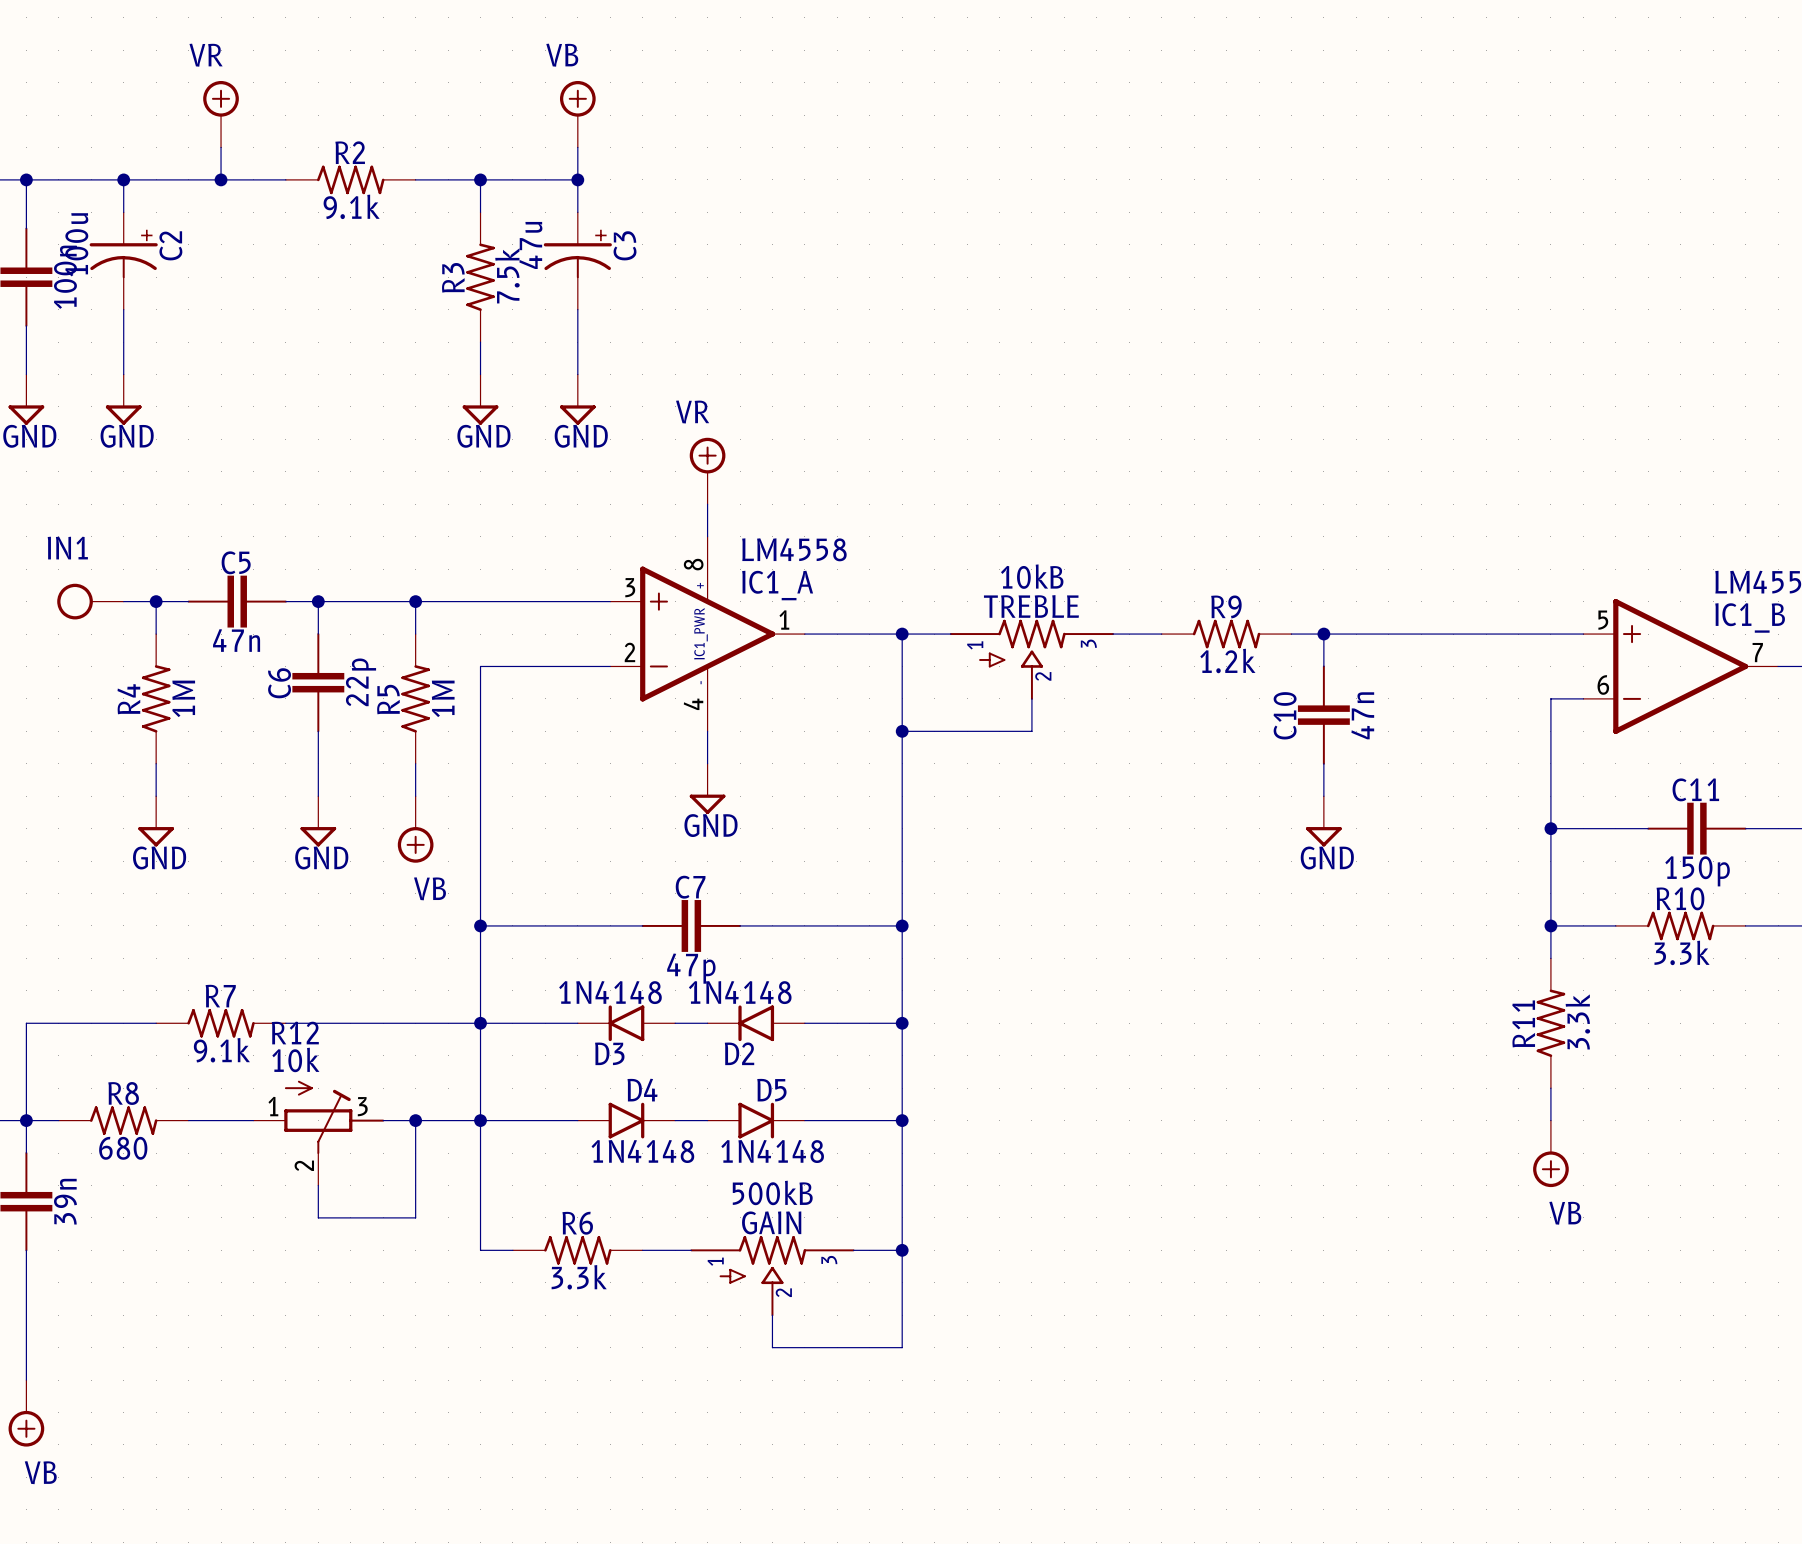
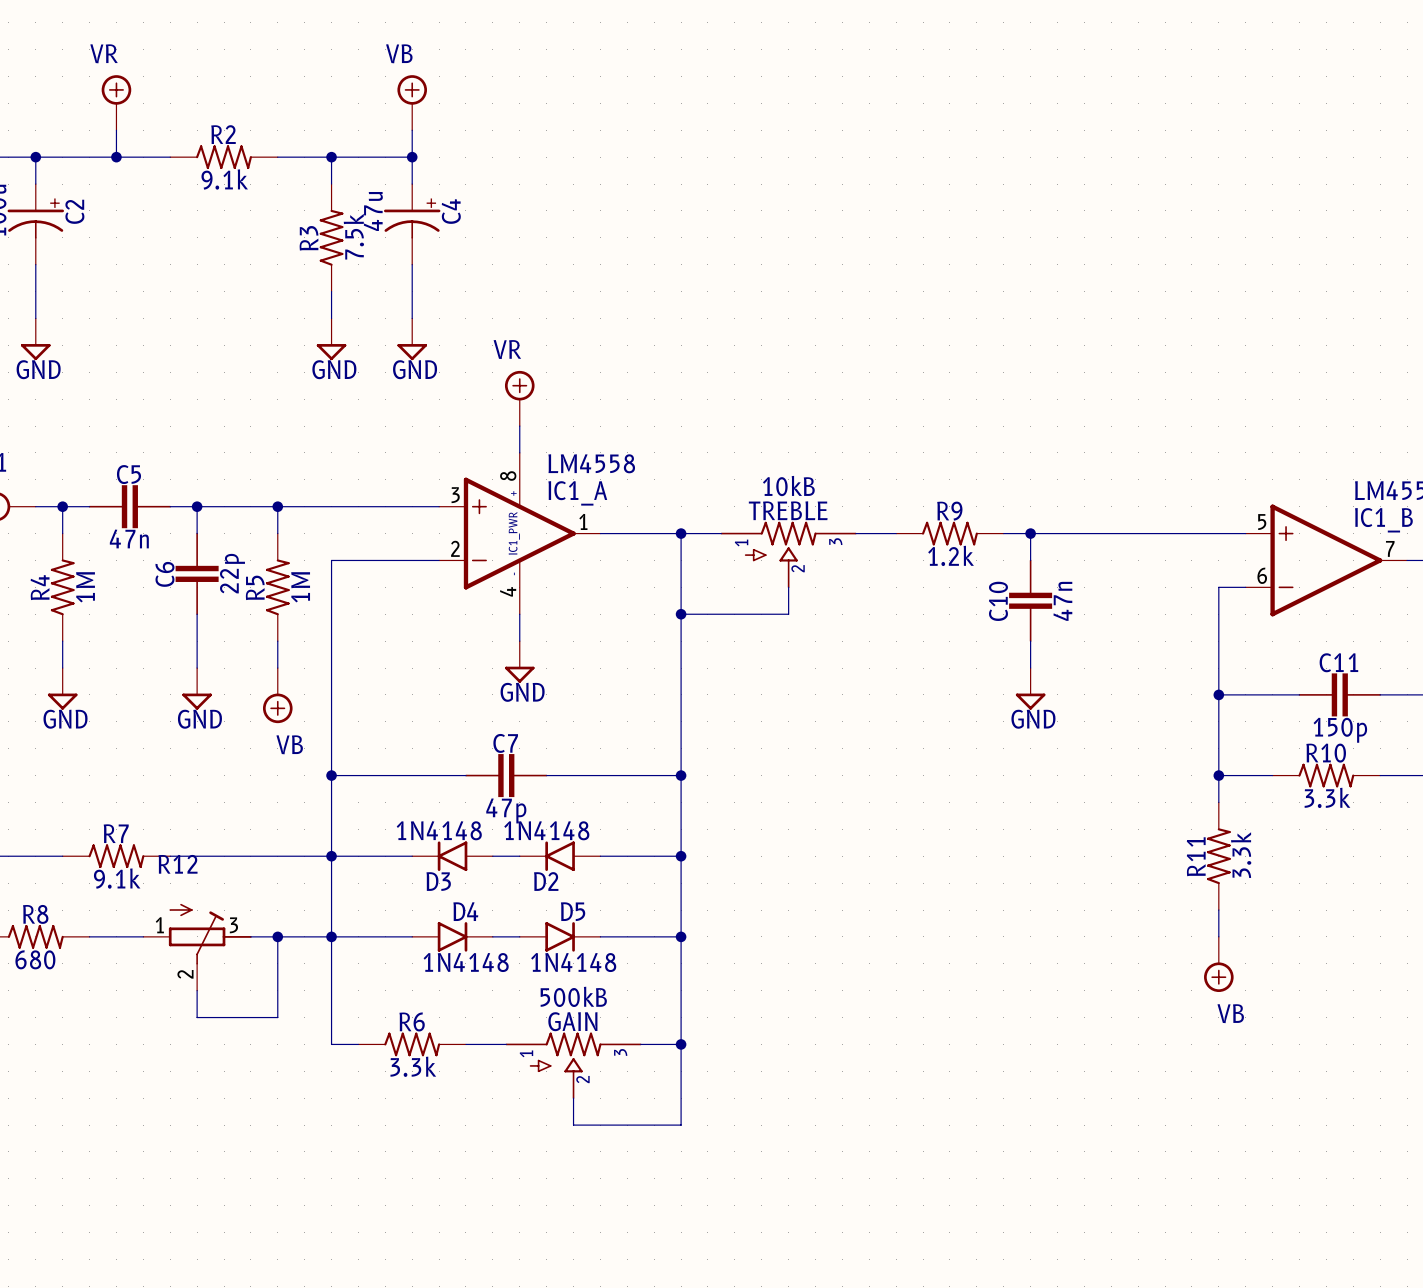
C3 name: C3 (625, 245) -> C4 (451, 211)
R12 value: 10k (295, 1059) -> none

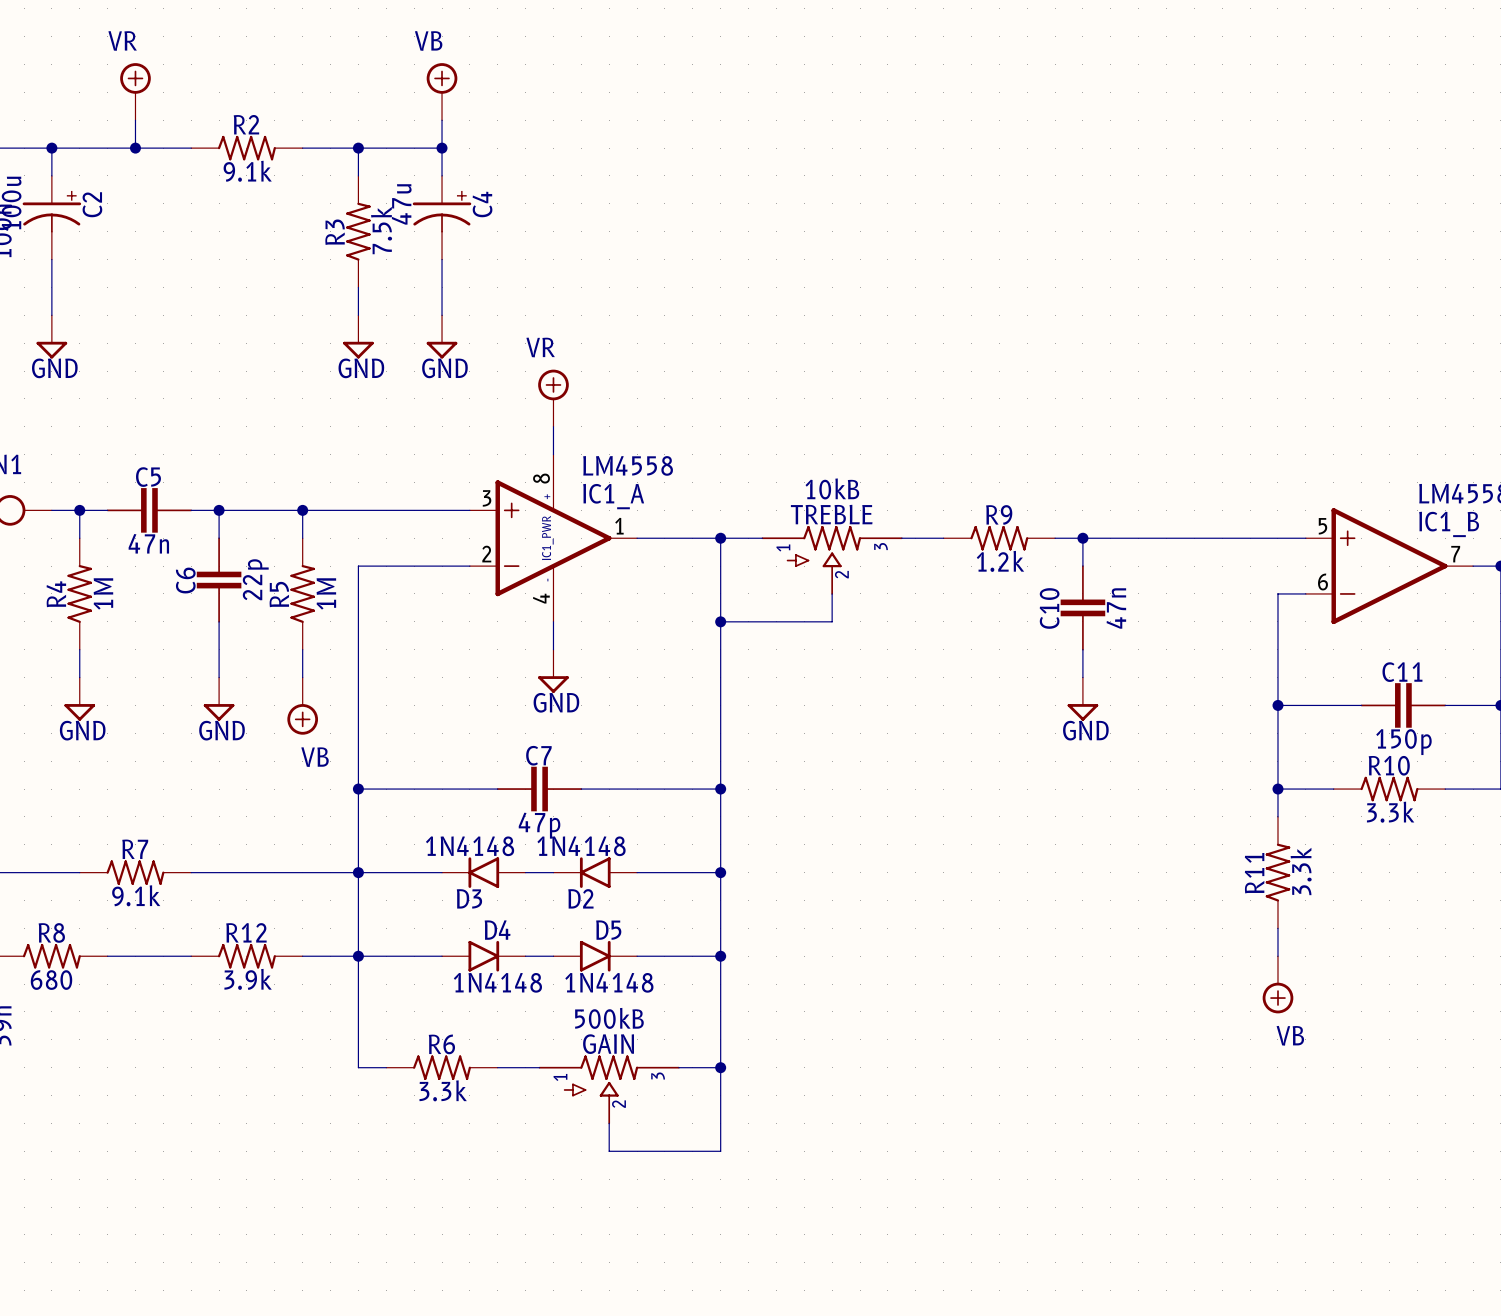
R12 name position: R12 (178, 864) -> R12 (246, 932)
R12 symbol: [143, 903, 252, 991] -> [191, 943, 303, 969]
wire: (250, 936) (277, 936) (277, 1017) (197, 1017) (197, 990) -> none
junction: (277, 936) -> none
R12 value: none -> 3.9k (248, 979)

